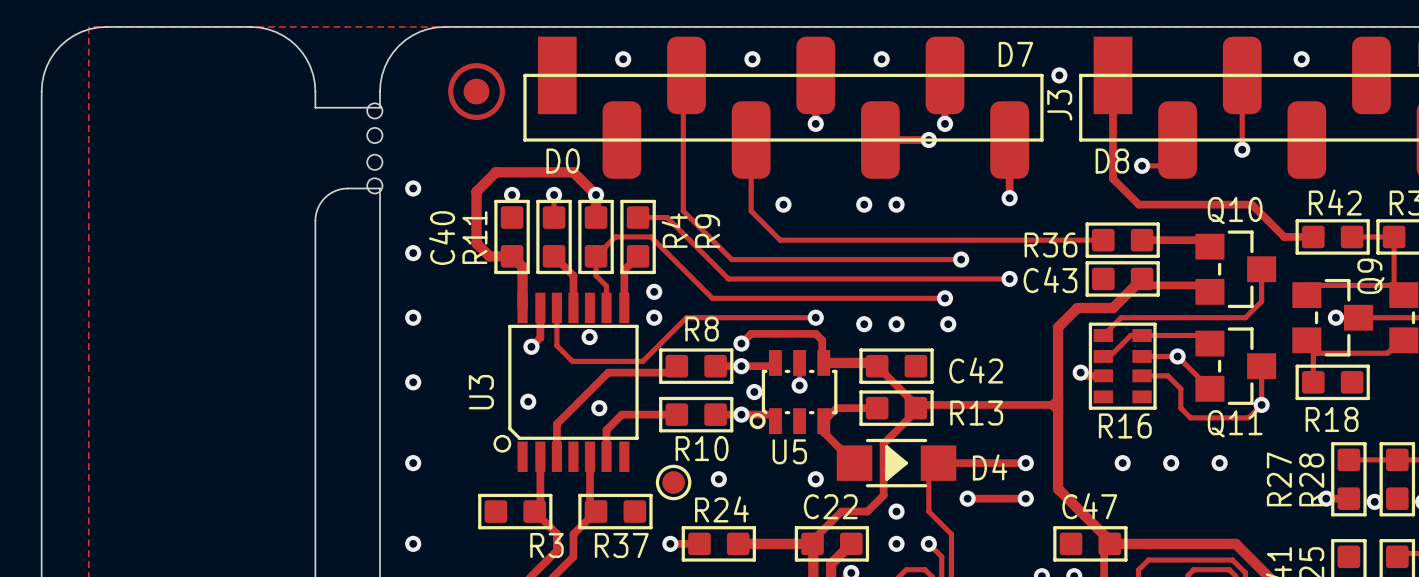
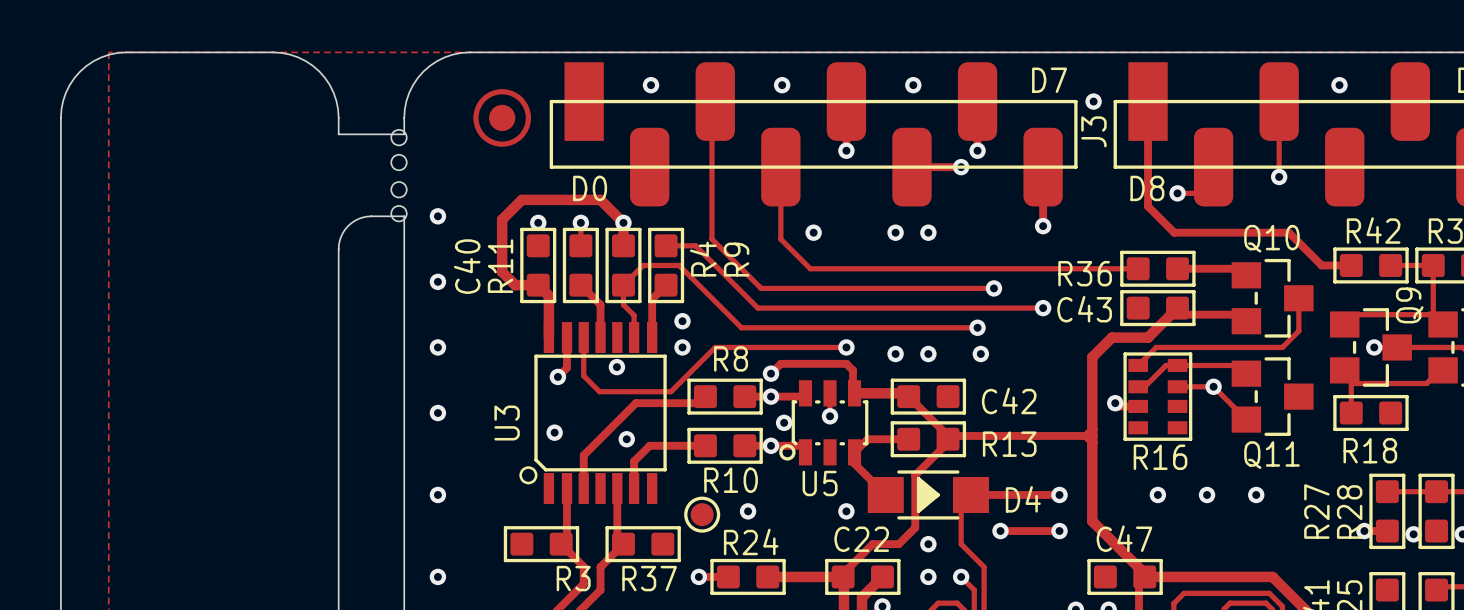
track: (1261, 366) (1261, 404) (1248, 417) (1190, 417) (1180, 408) (1180, 388) (1167, 375) (1142, 375) -> none
via: (1261, 404) -> none

